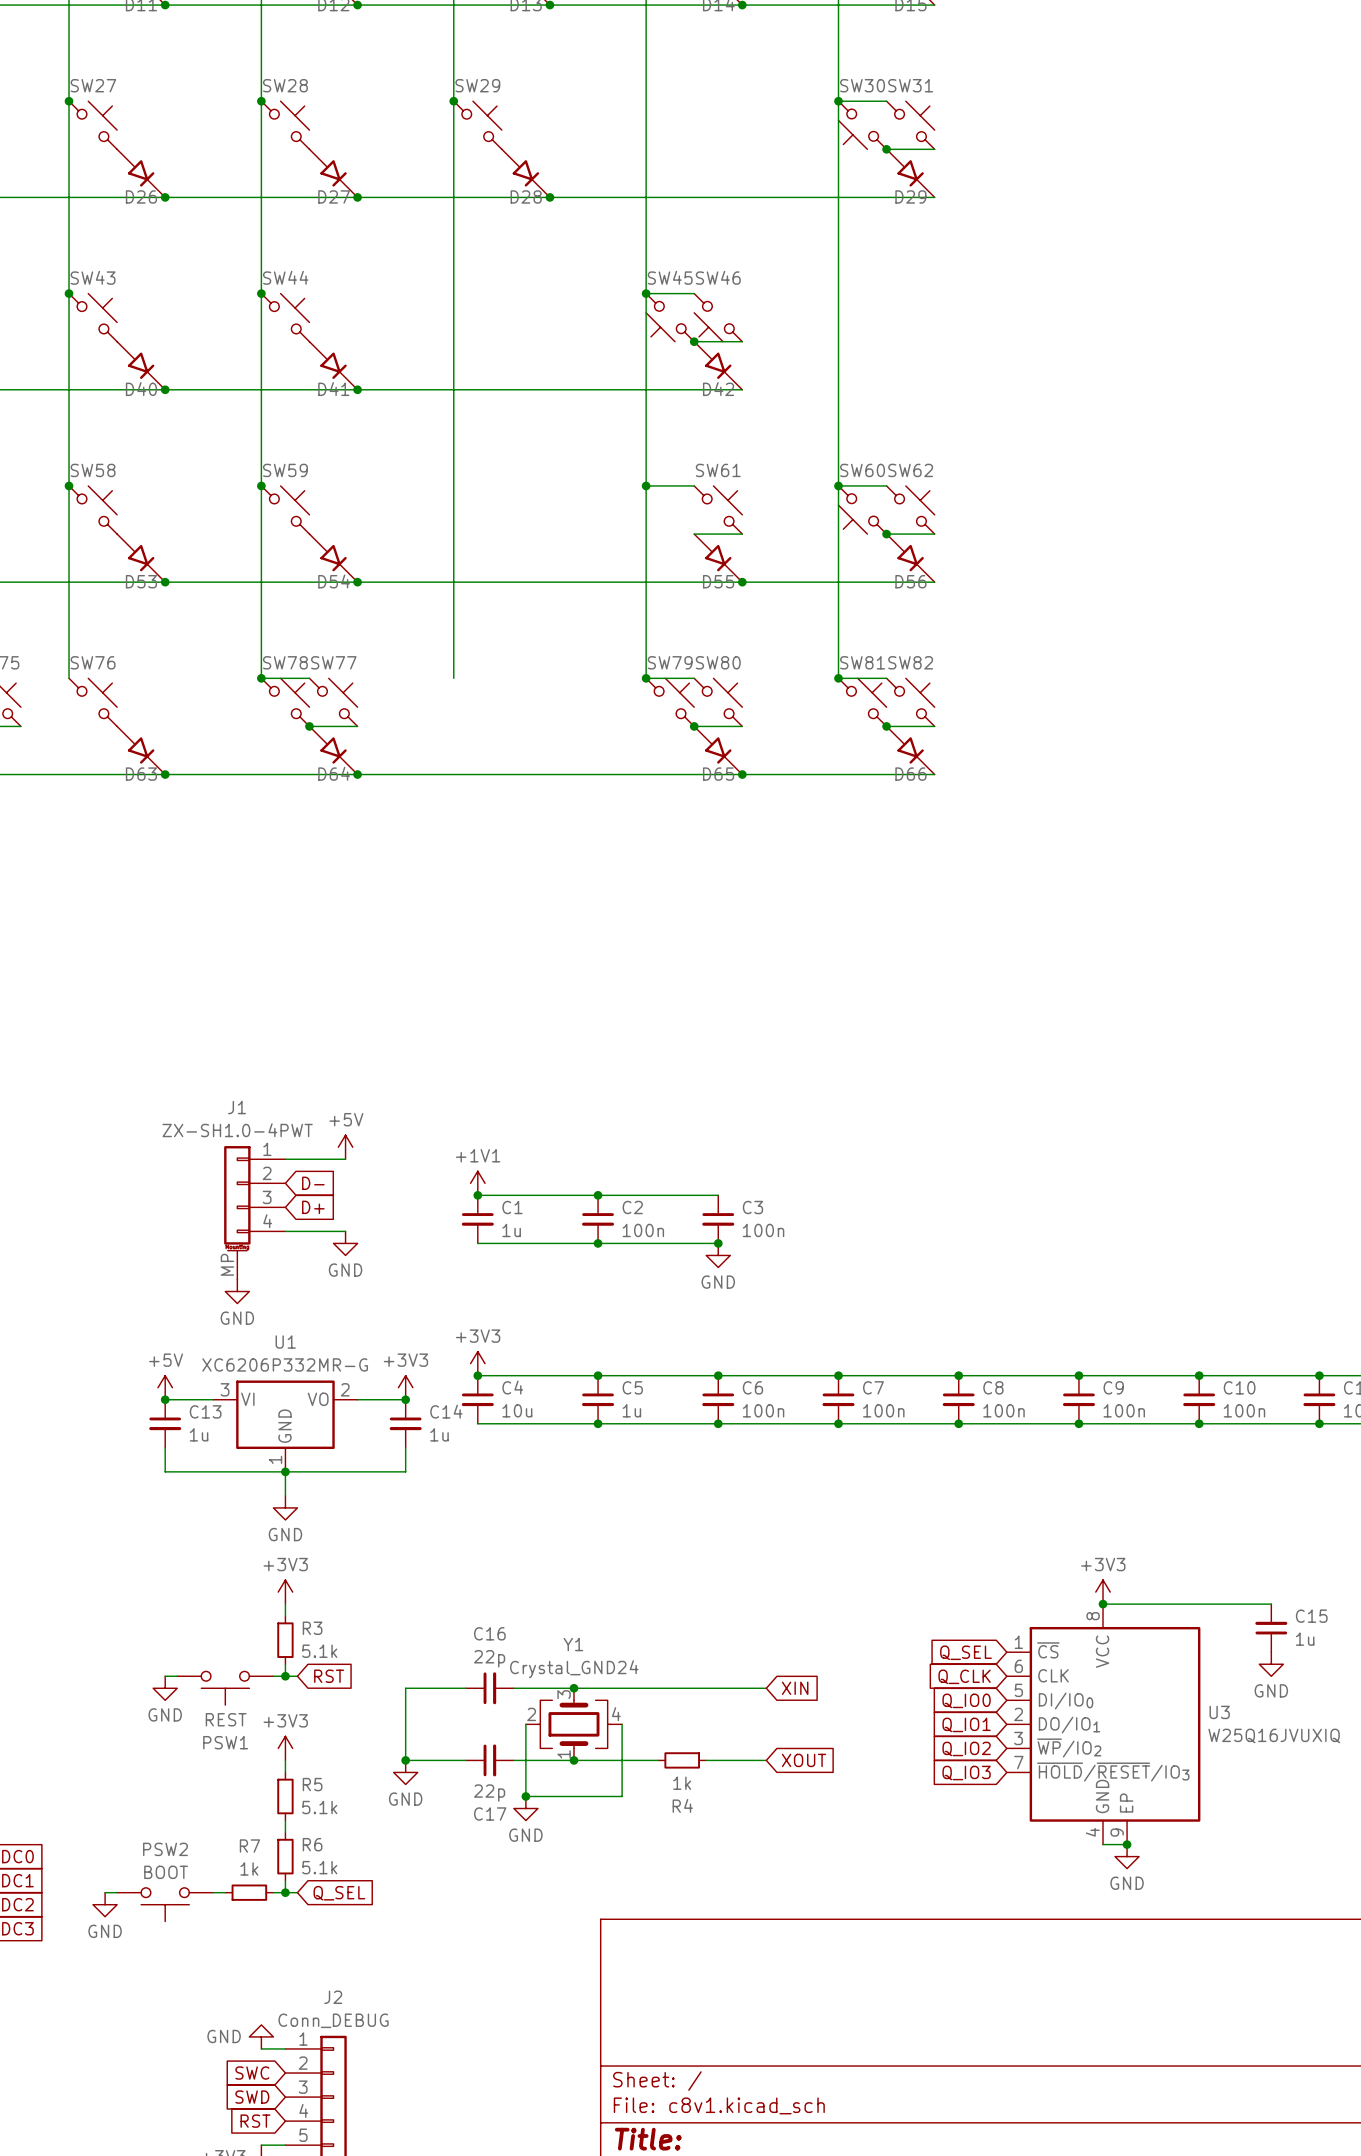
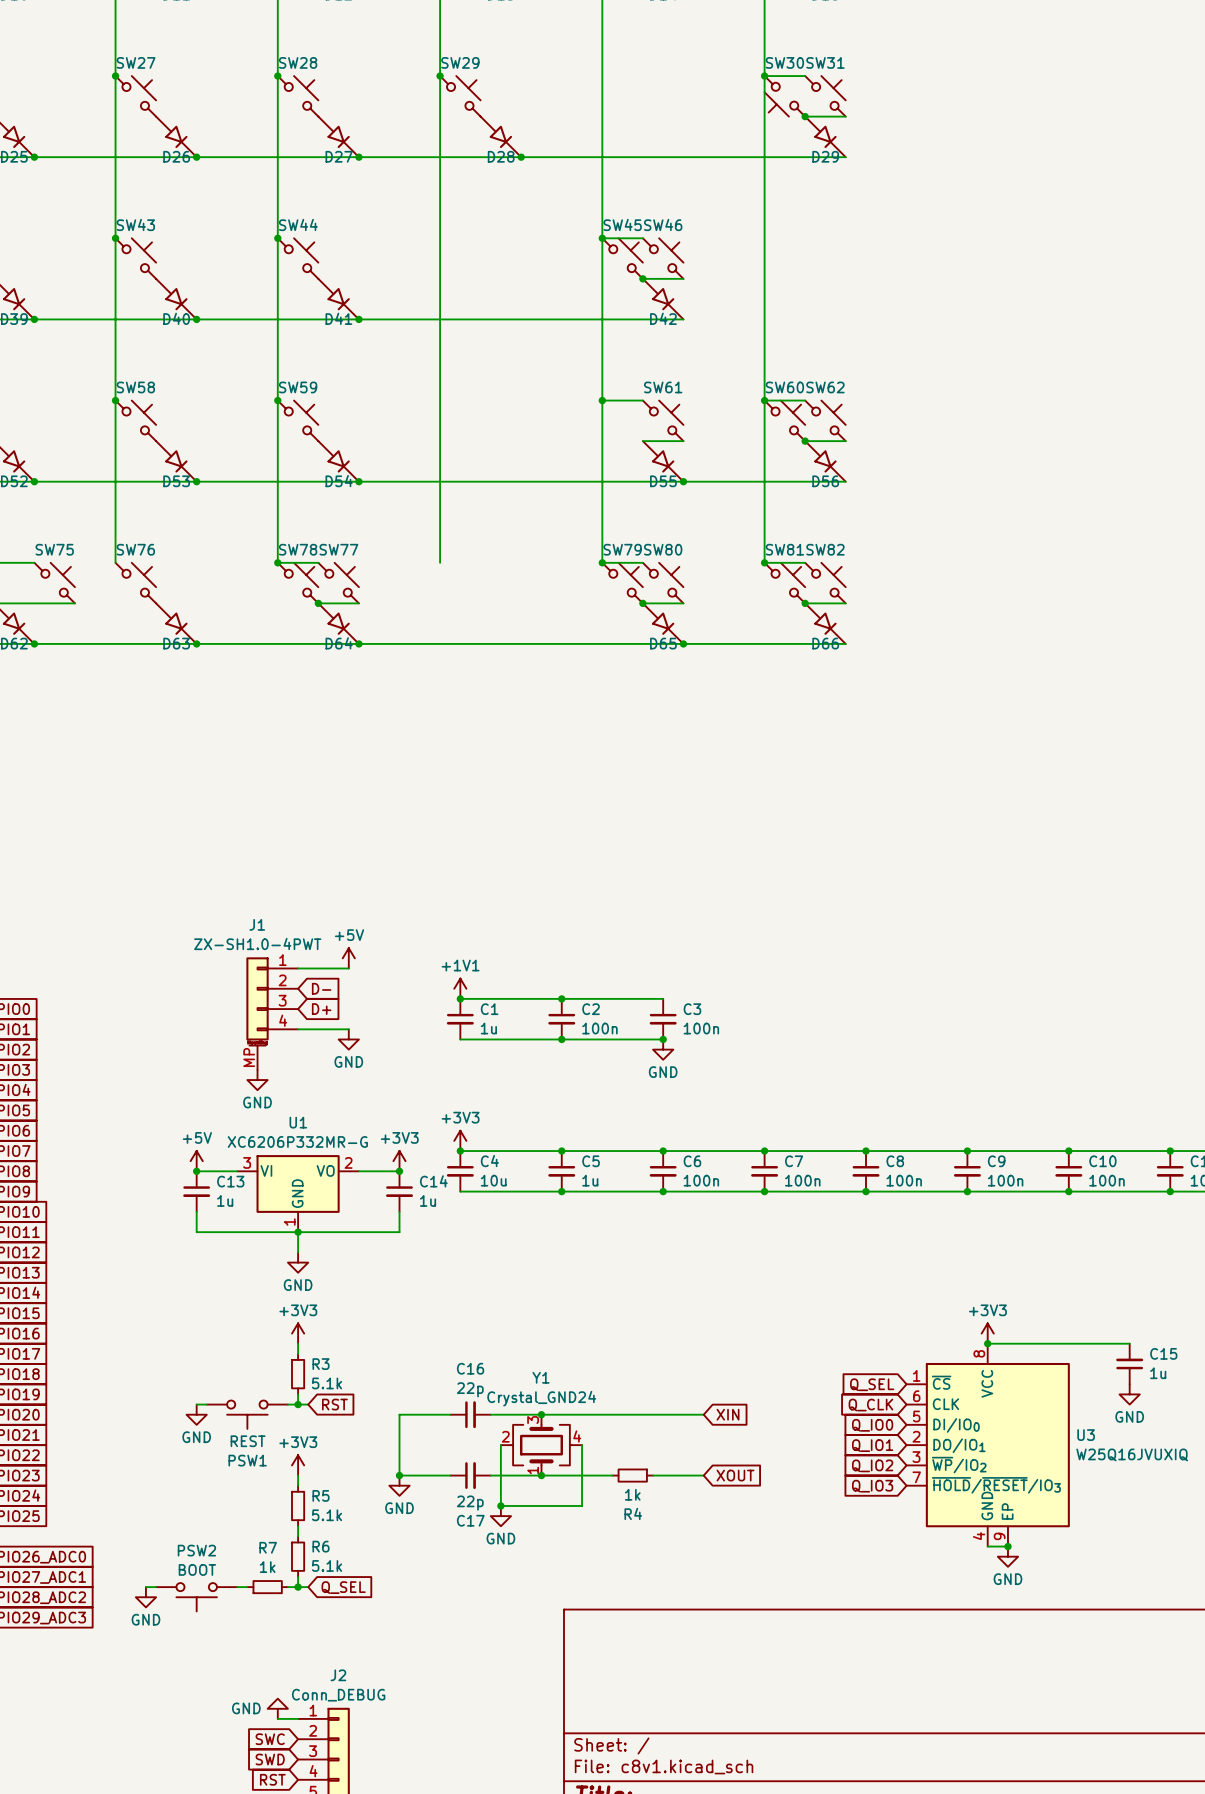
SW45 rotation: 0° (670, 317) -> 180° (622, 258)
SW46 rotation: 0° (718, 317) -> 180° (663, 258)
SW60 rotation: 0° (862, 510) -> 180° (784, 420)

